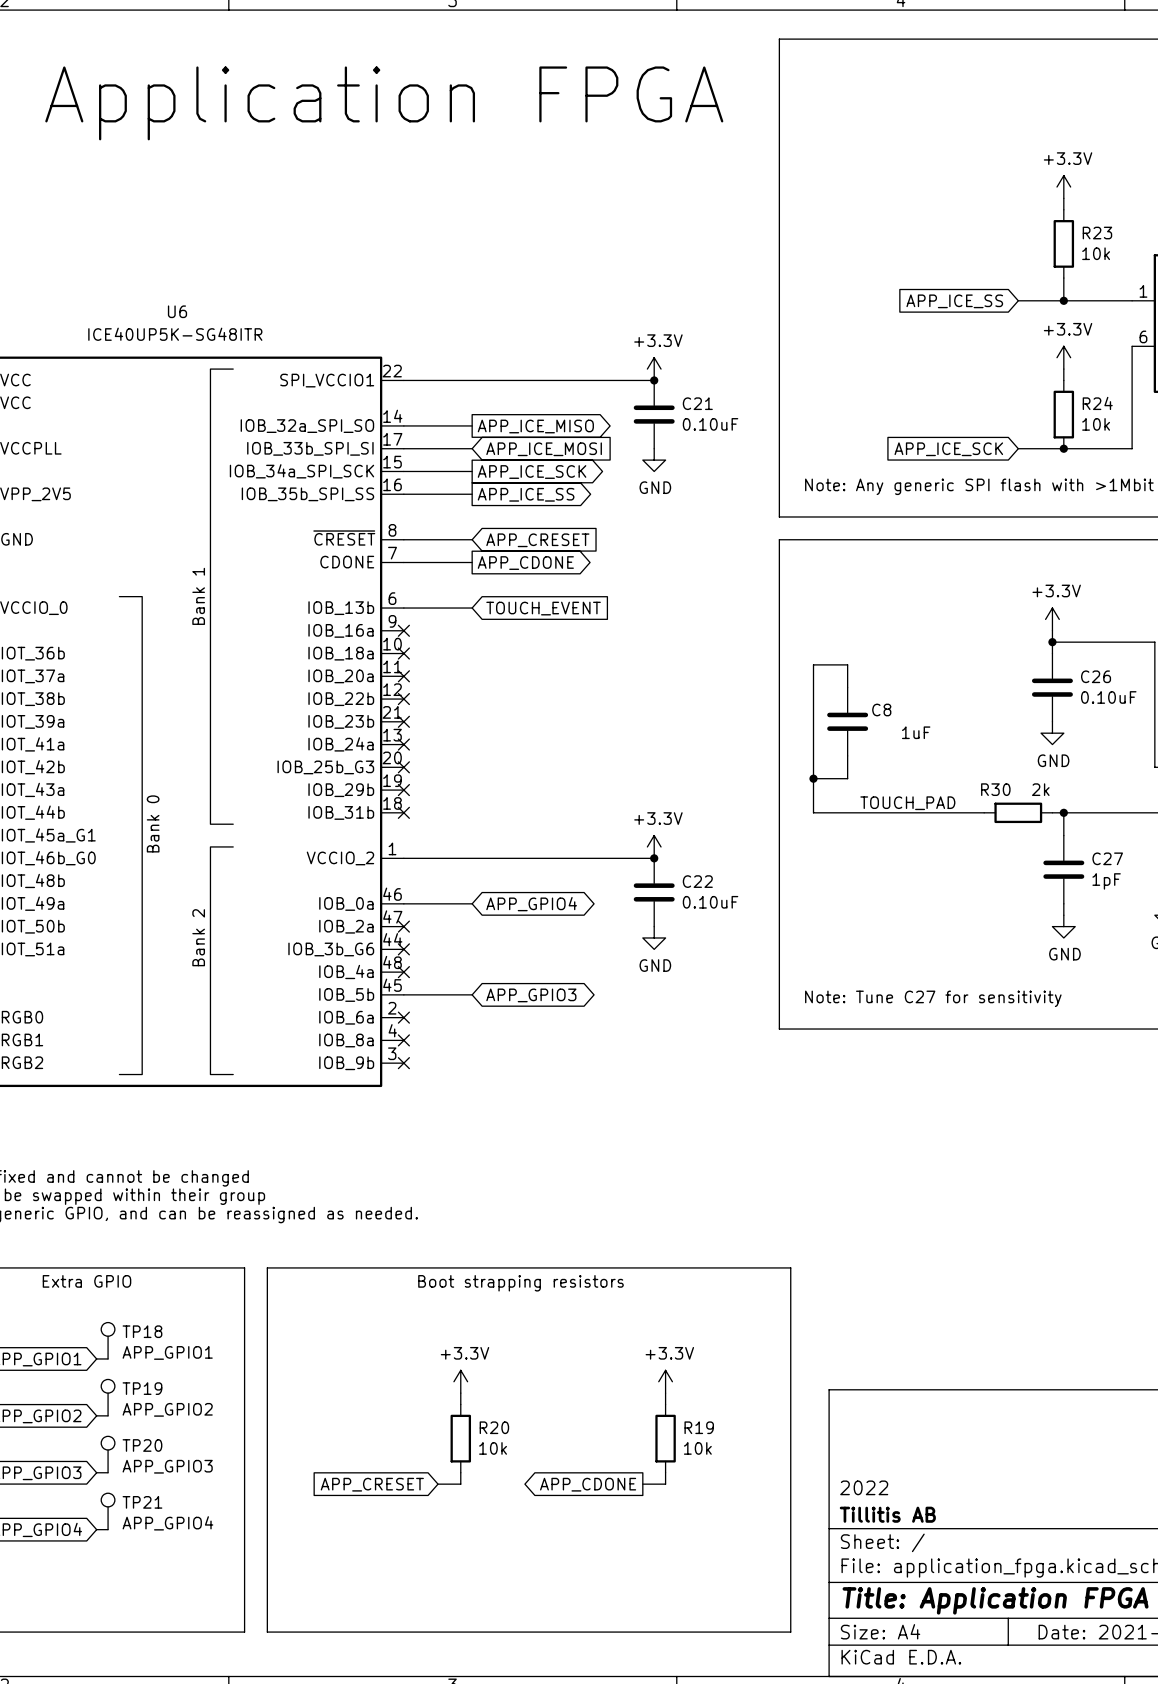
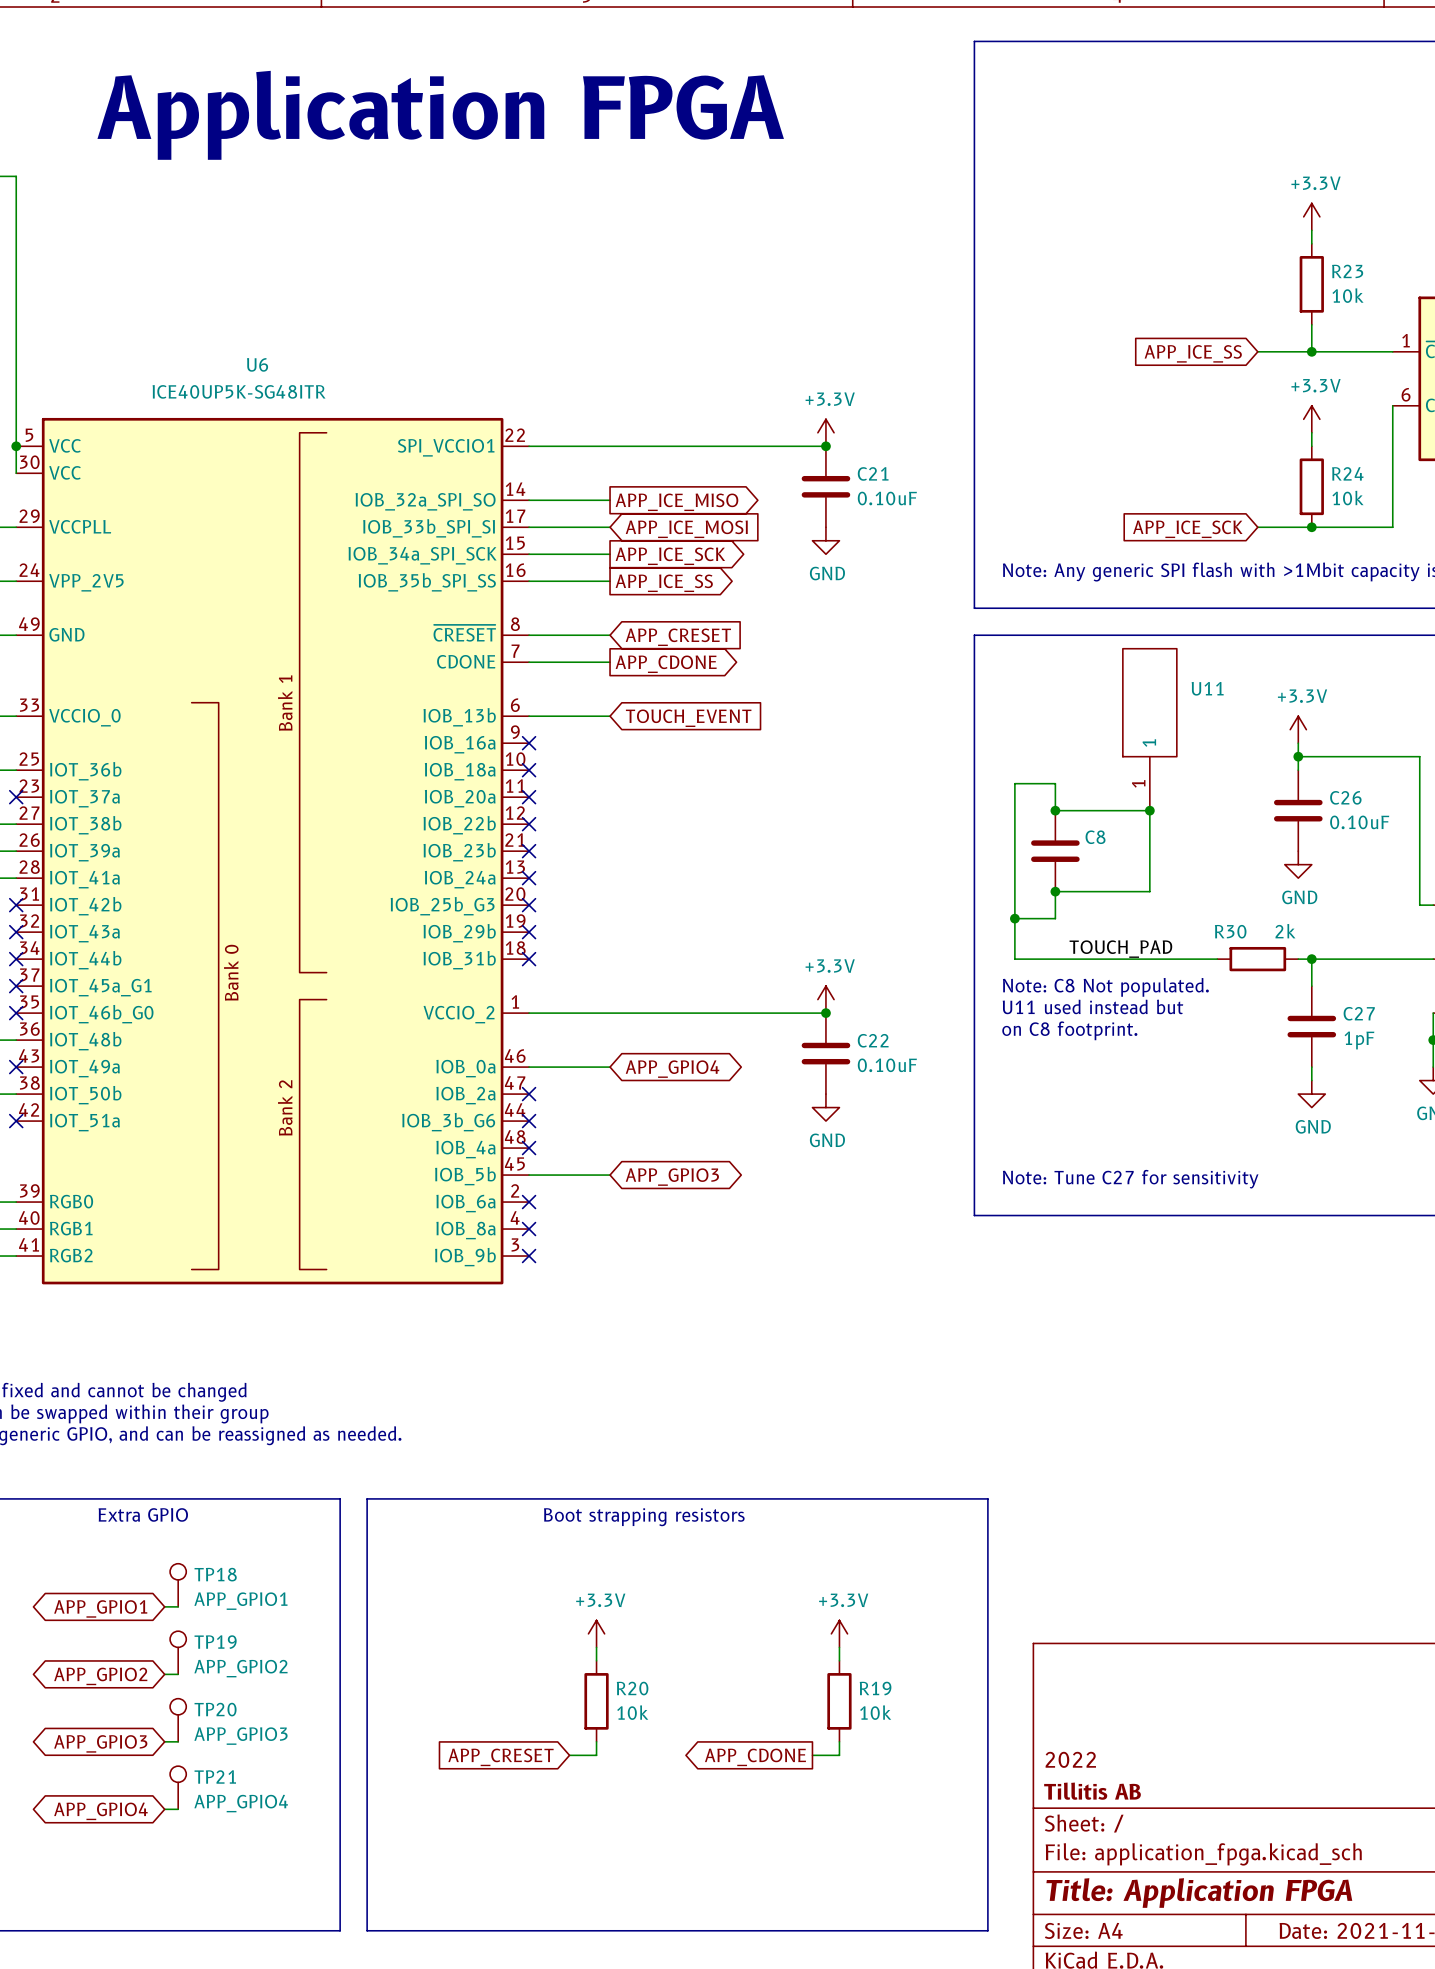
U11: none -> (1149, 729)
wire: none -> (1055, 810) (1149, 810) (1149, 891) (1055, 891)
junction: none -> (1055, 810)
junction: none -> (1149, 810)
C8 value: 1uF (916, 732) -> none
junction: none -> (1055, 891)
text: none -> Note: C8 Not populated. (1105, 987)
text: none -> U11 used instead but (1092, 1006)
text: none -> on C8 footprint. (1069, 1030)

